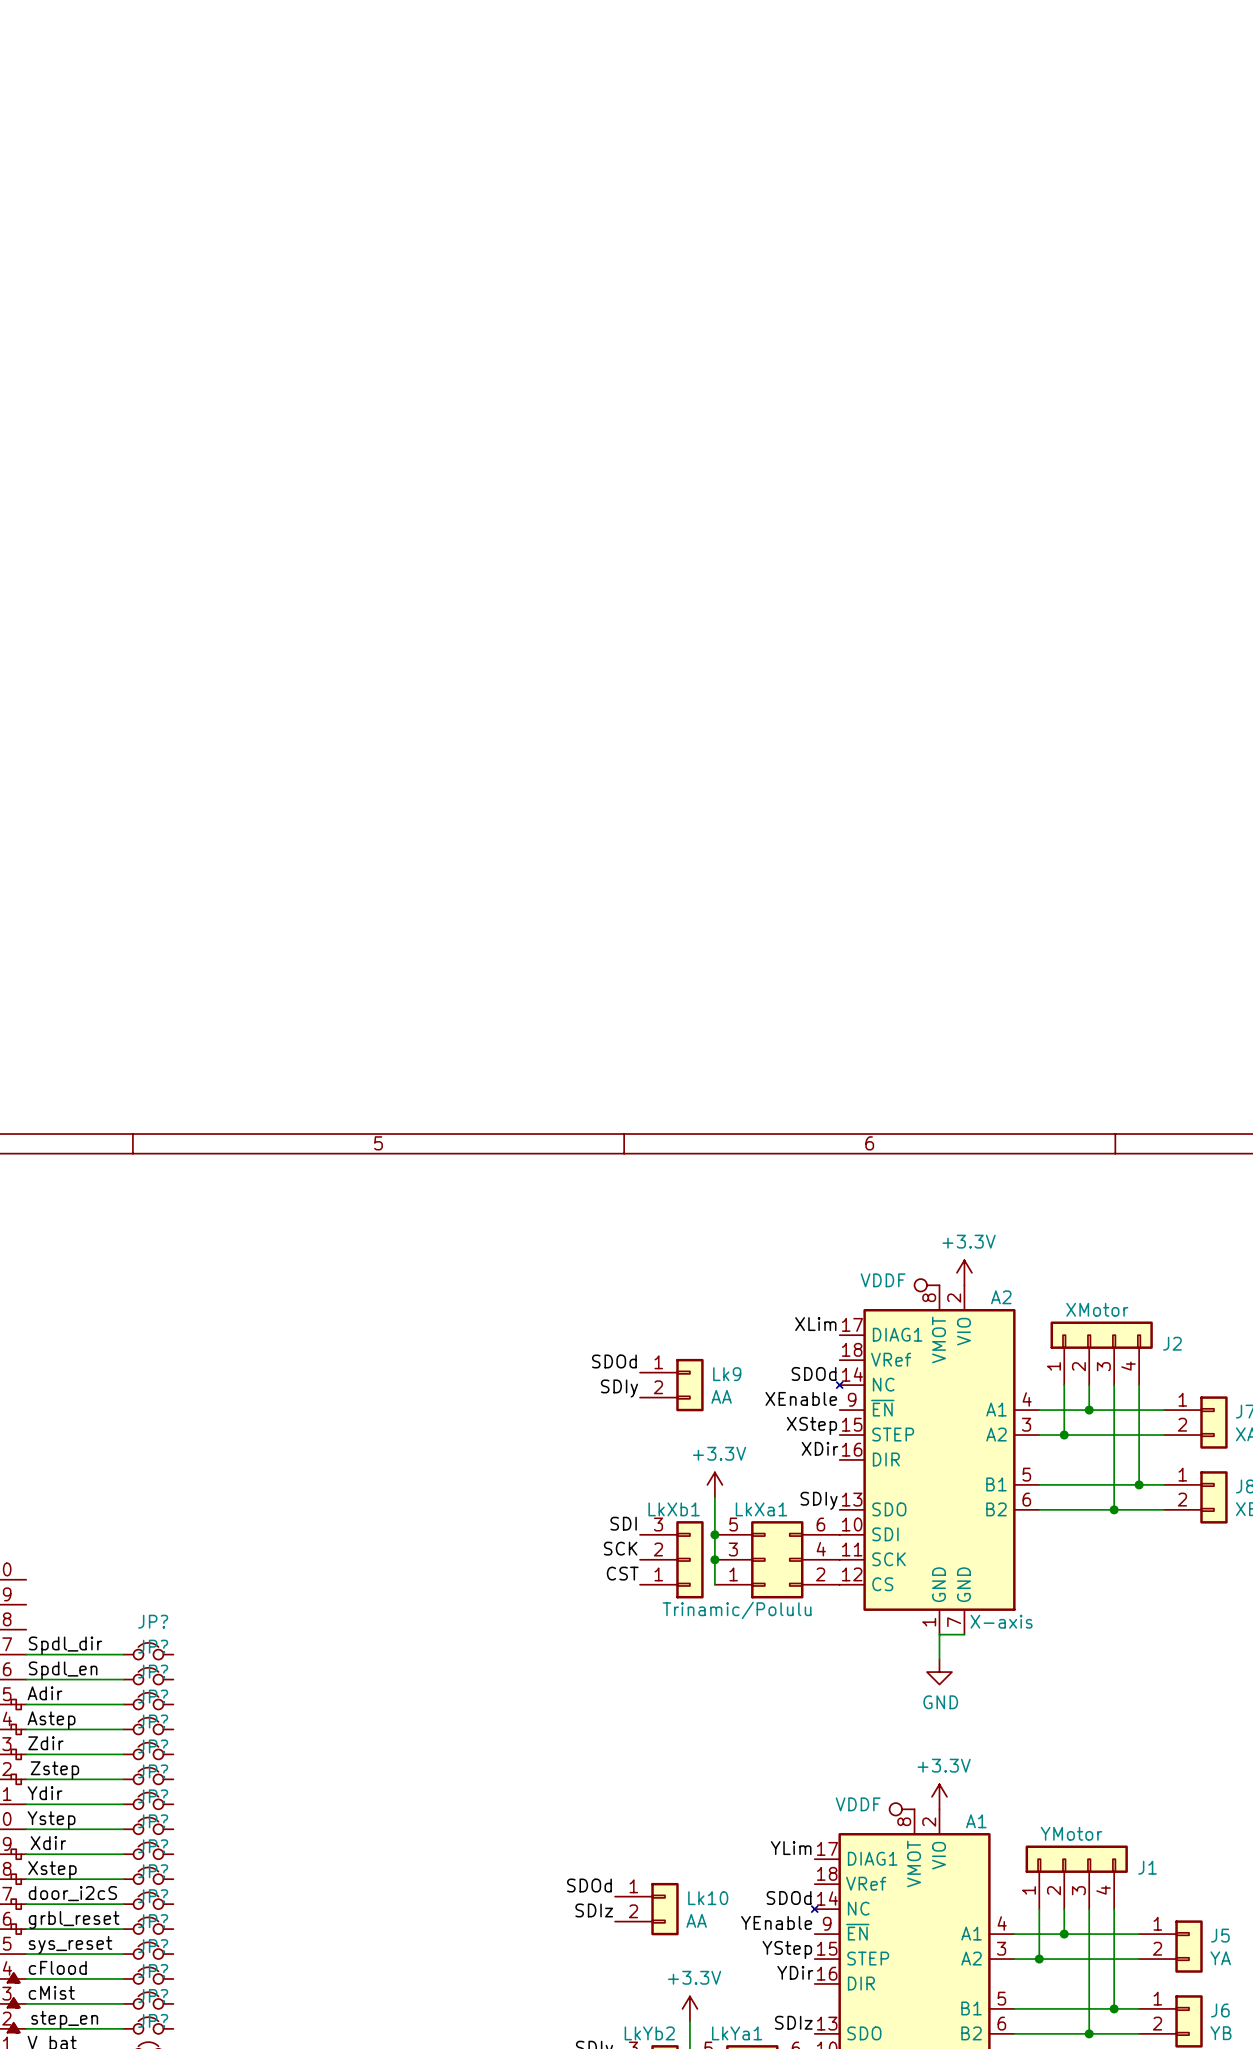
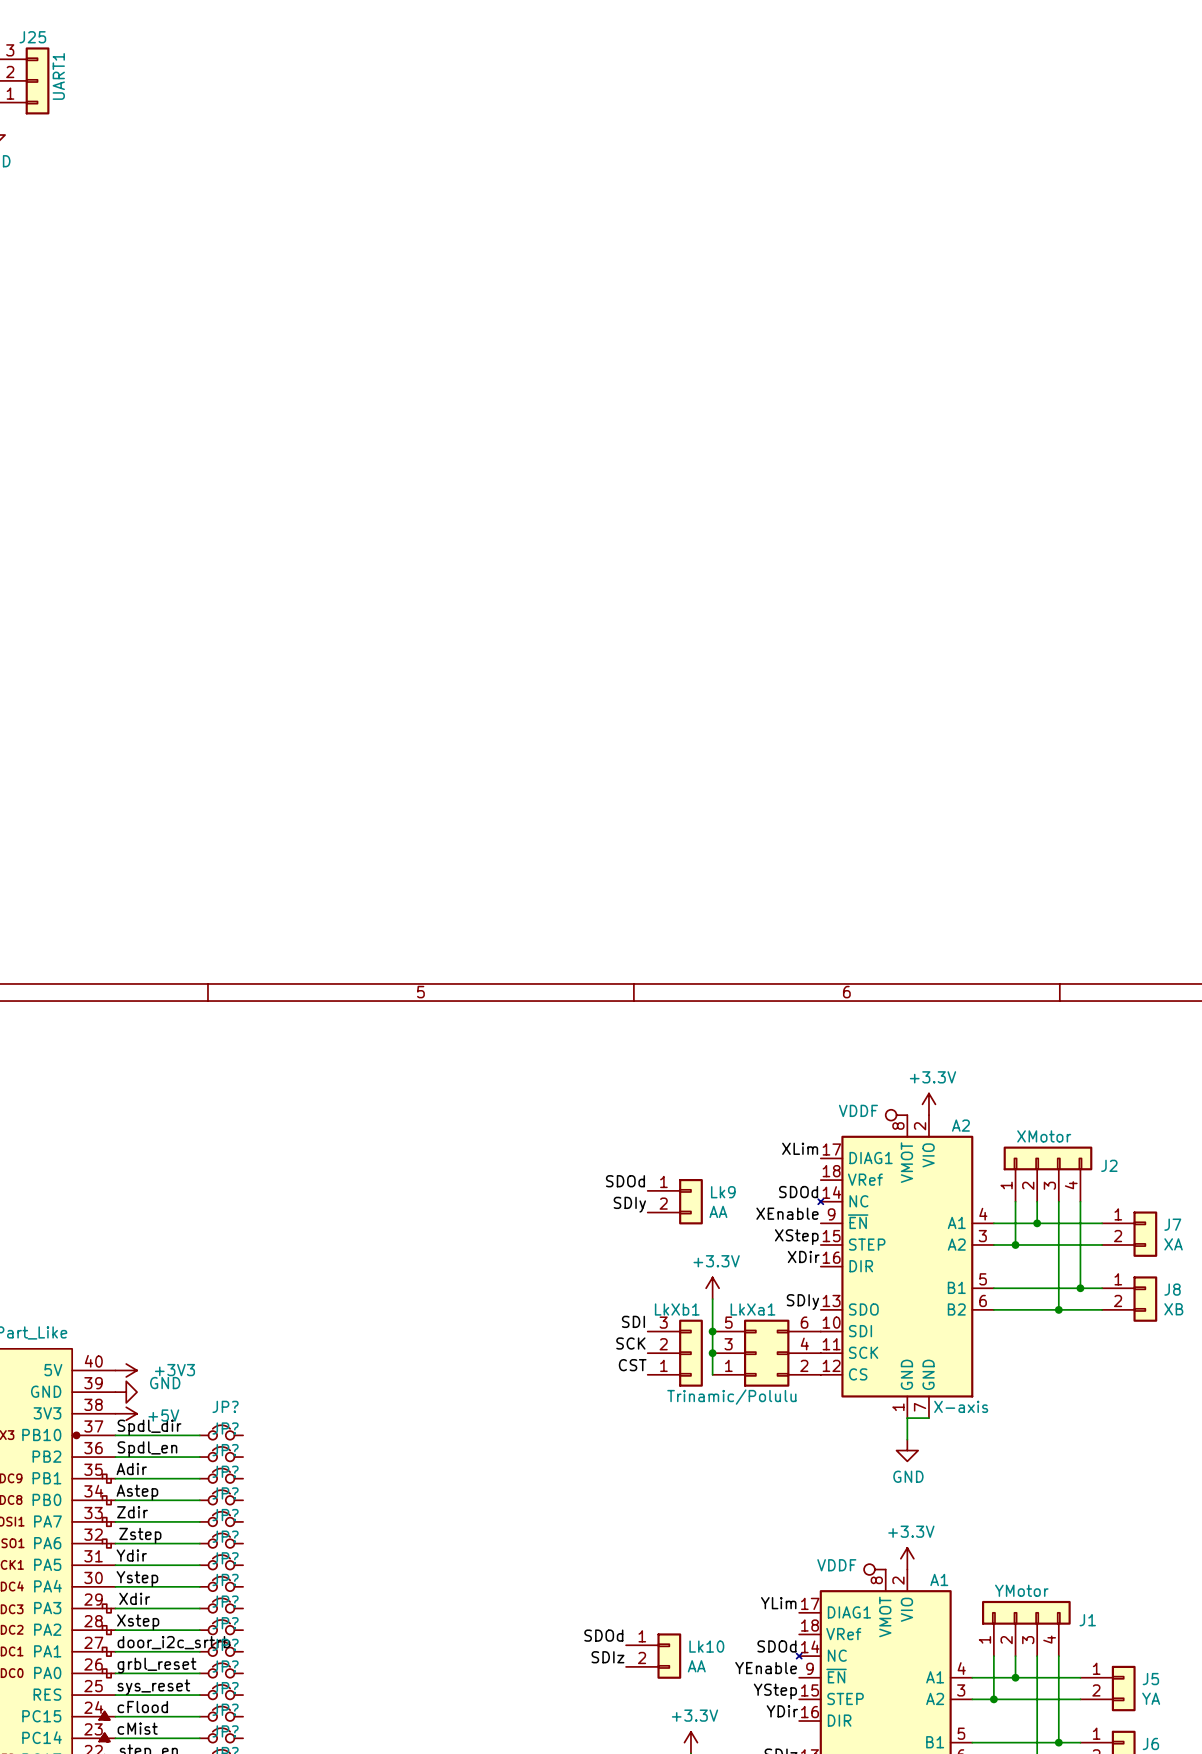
power symbol: none -> +3V3 (126, 1370)
power symbol: none -> GND (126, 1392)
power symbol: none -> +5V (126, 1413)
label: door_i2cS (72, 1893) -> door_i2c_srtrb (173, 1642)

